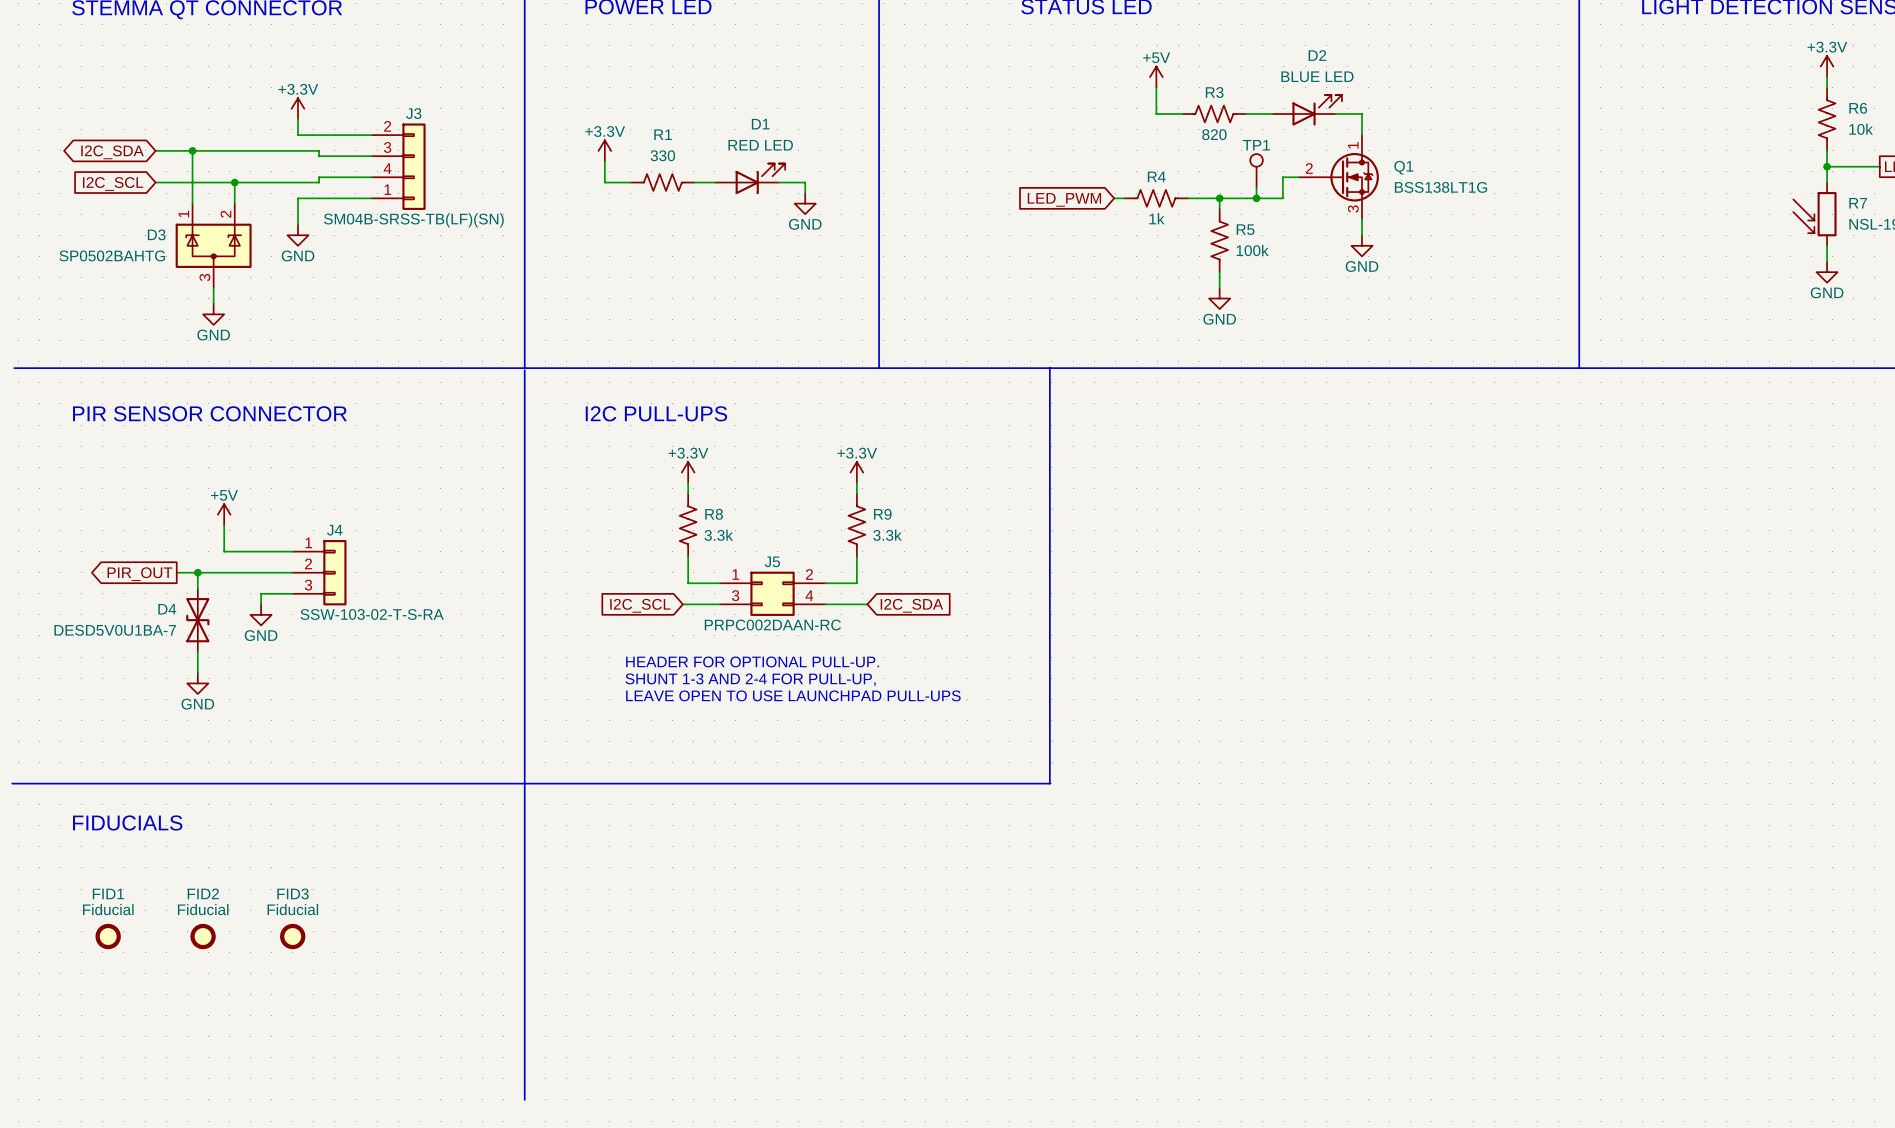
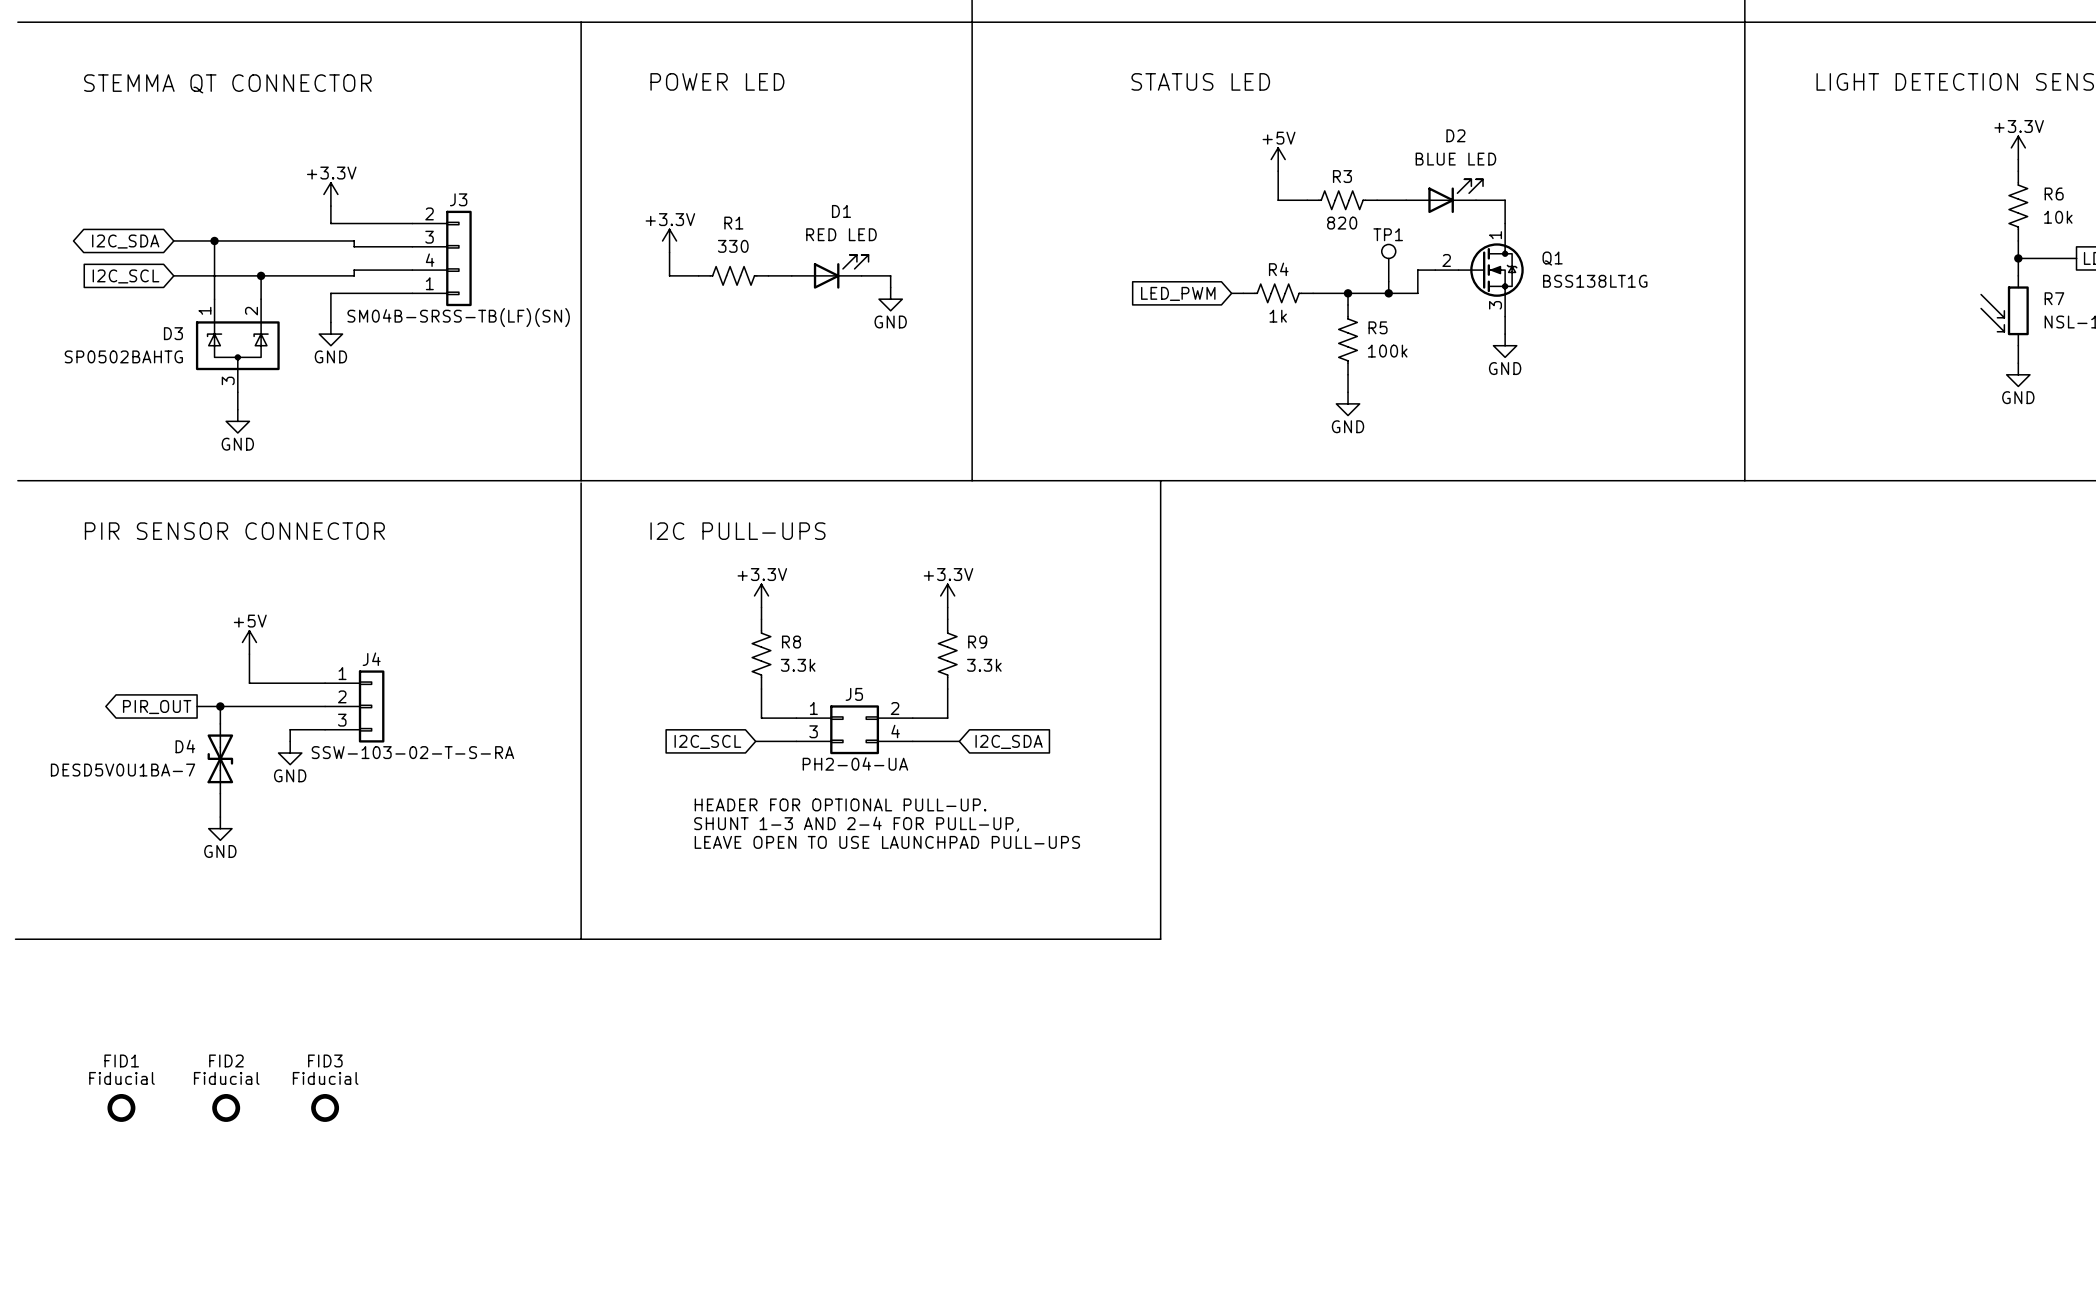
J5 value: PRPC002DAAN-RC (772, 625) -> PH2-04-UA (855, 763)
line: (524, 783) (524, 1099) -> none
text: FIDUCIALS (127, 822) -> none

